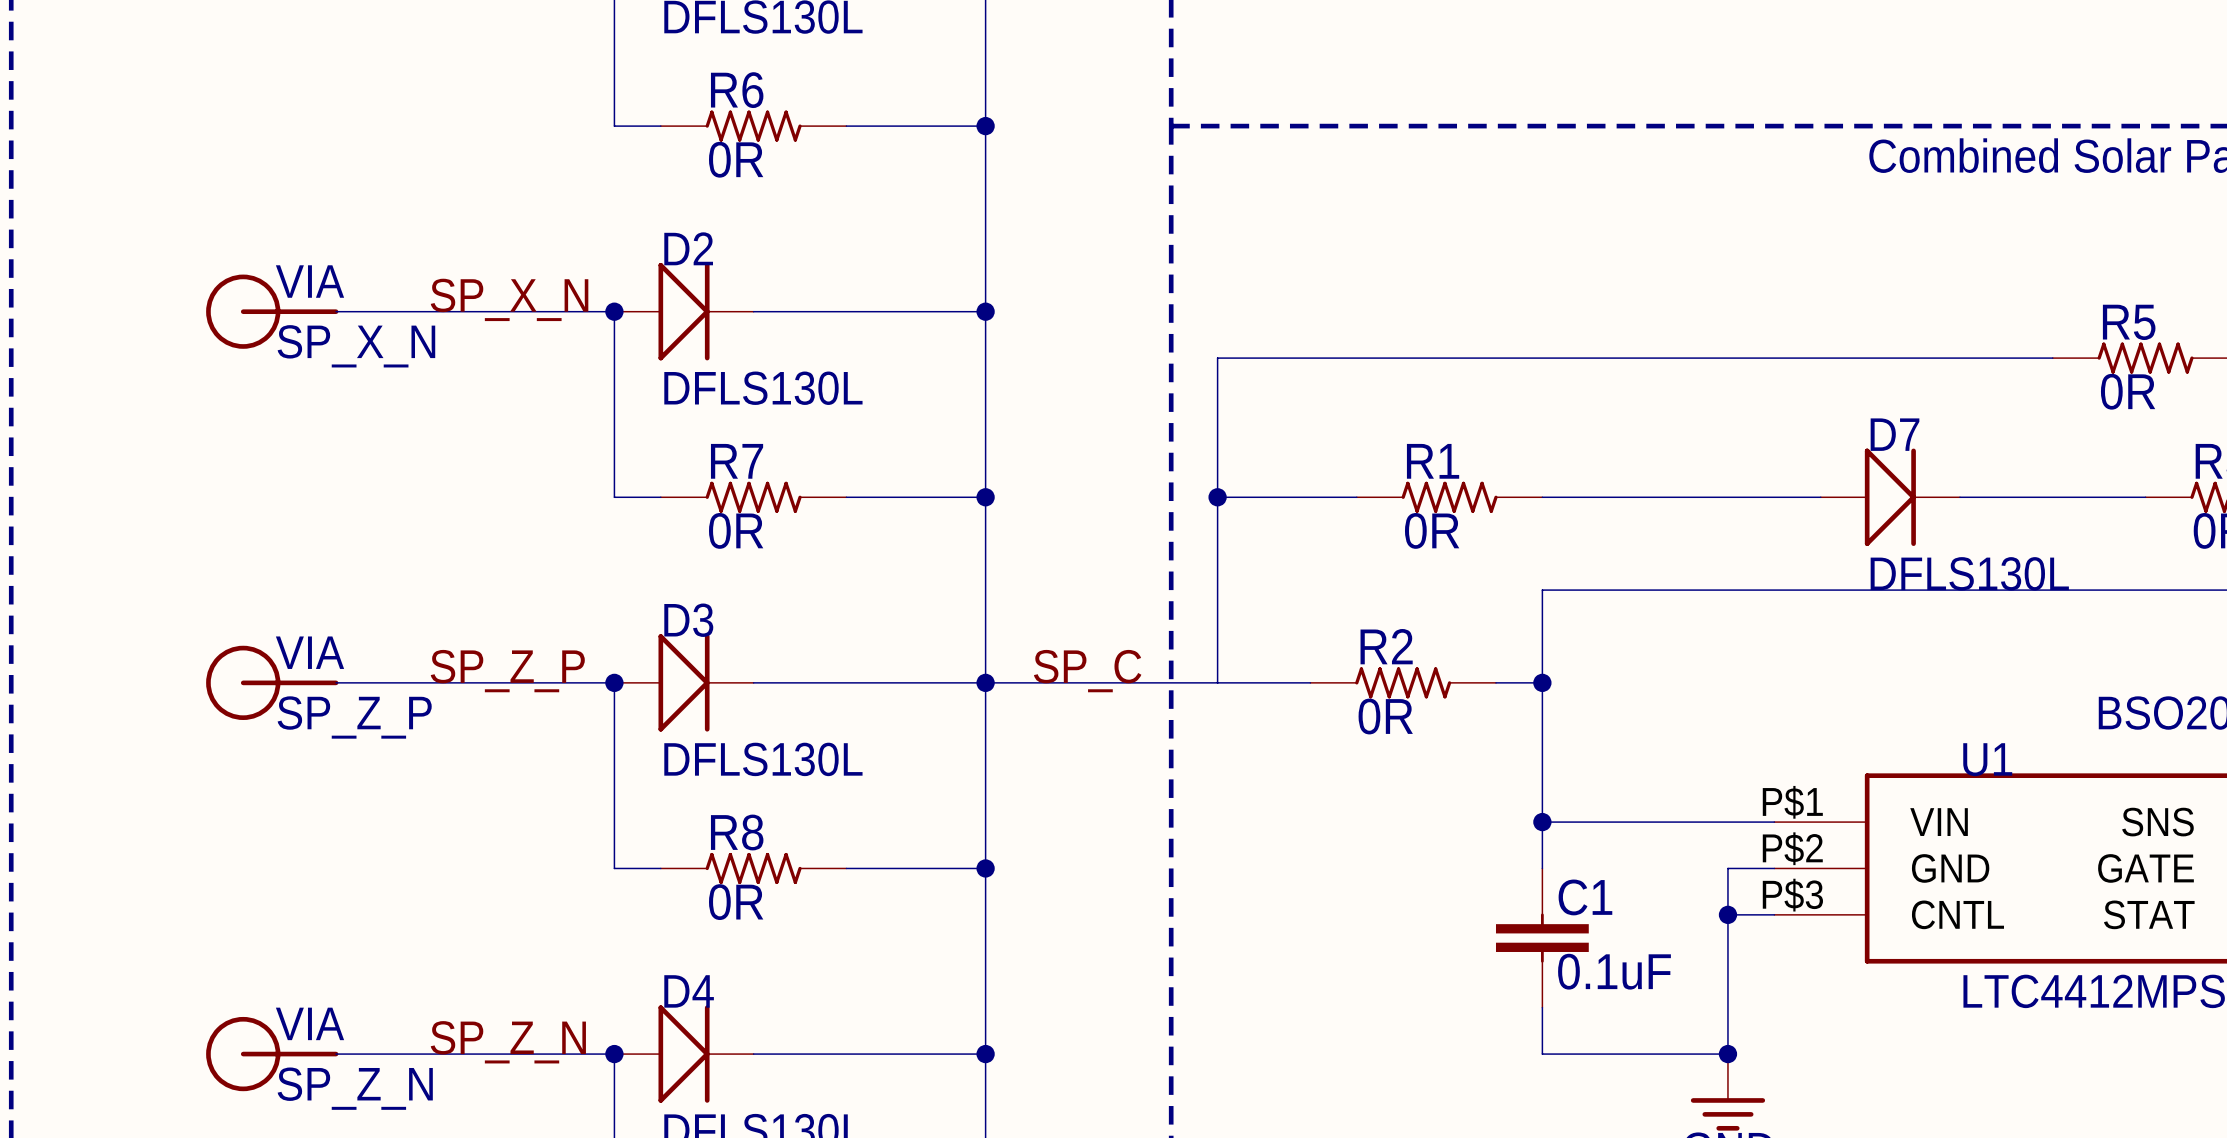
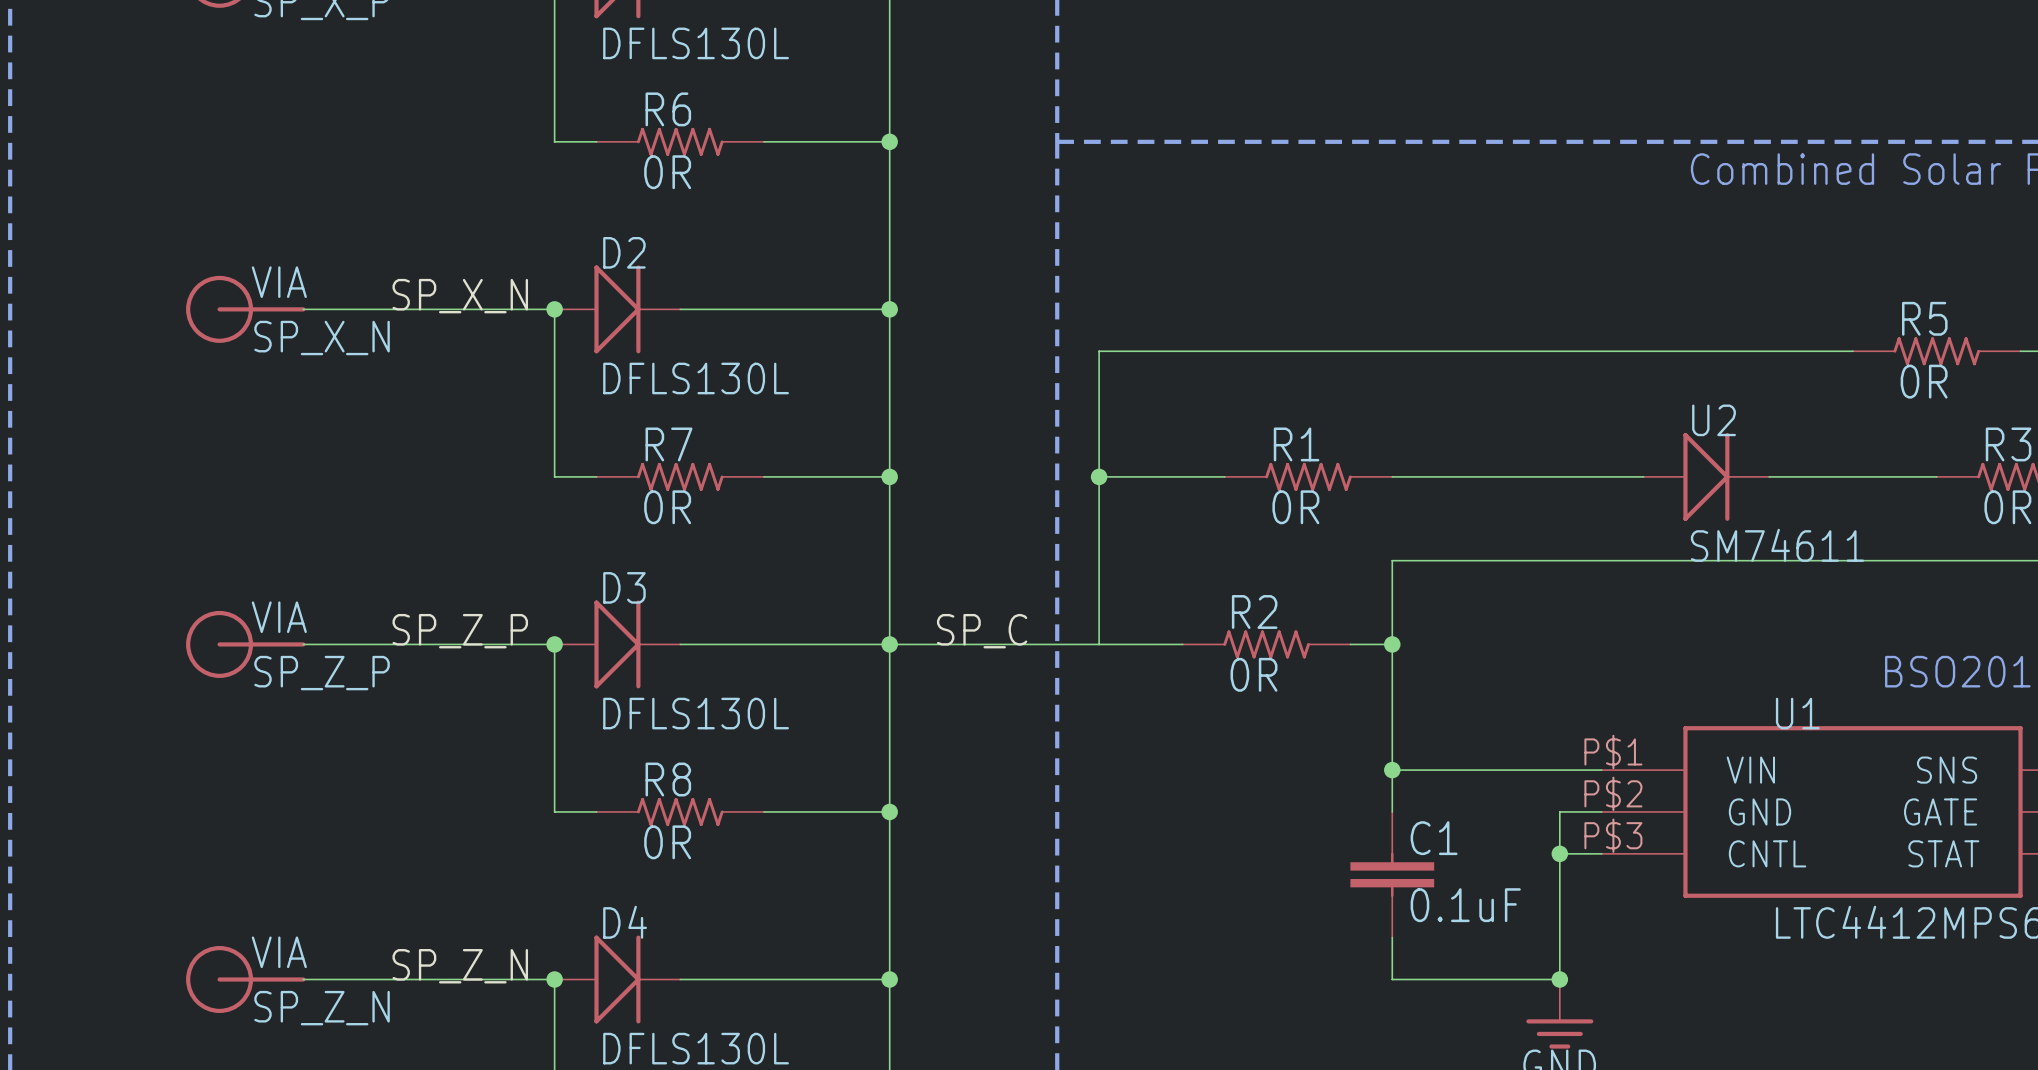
D7 name: D7 (1895, 434) -> U2 (1714, 420)
D7 value: DFLS130L (1969, 573) -> SM74611 (1777, 545)

